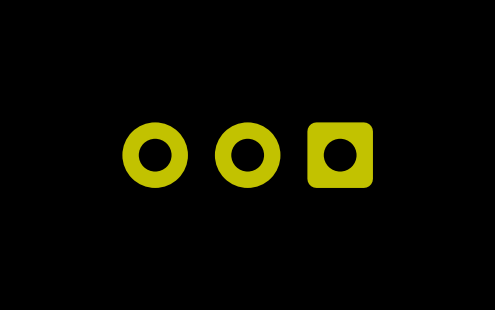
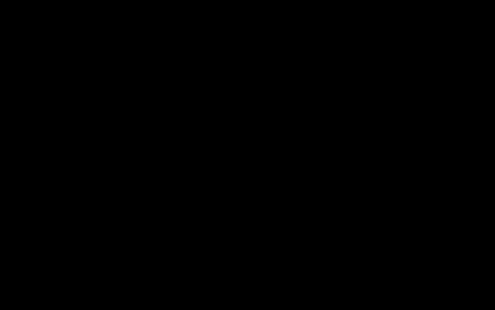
part: (247, 155) -> none

